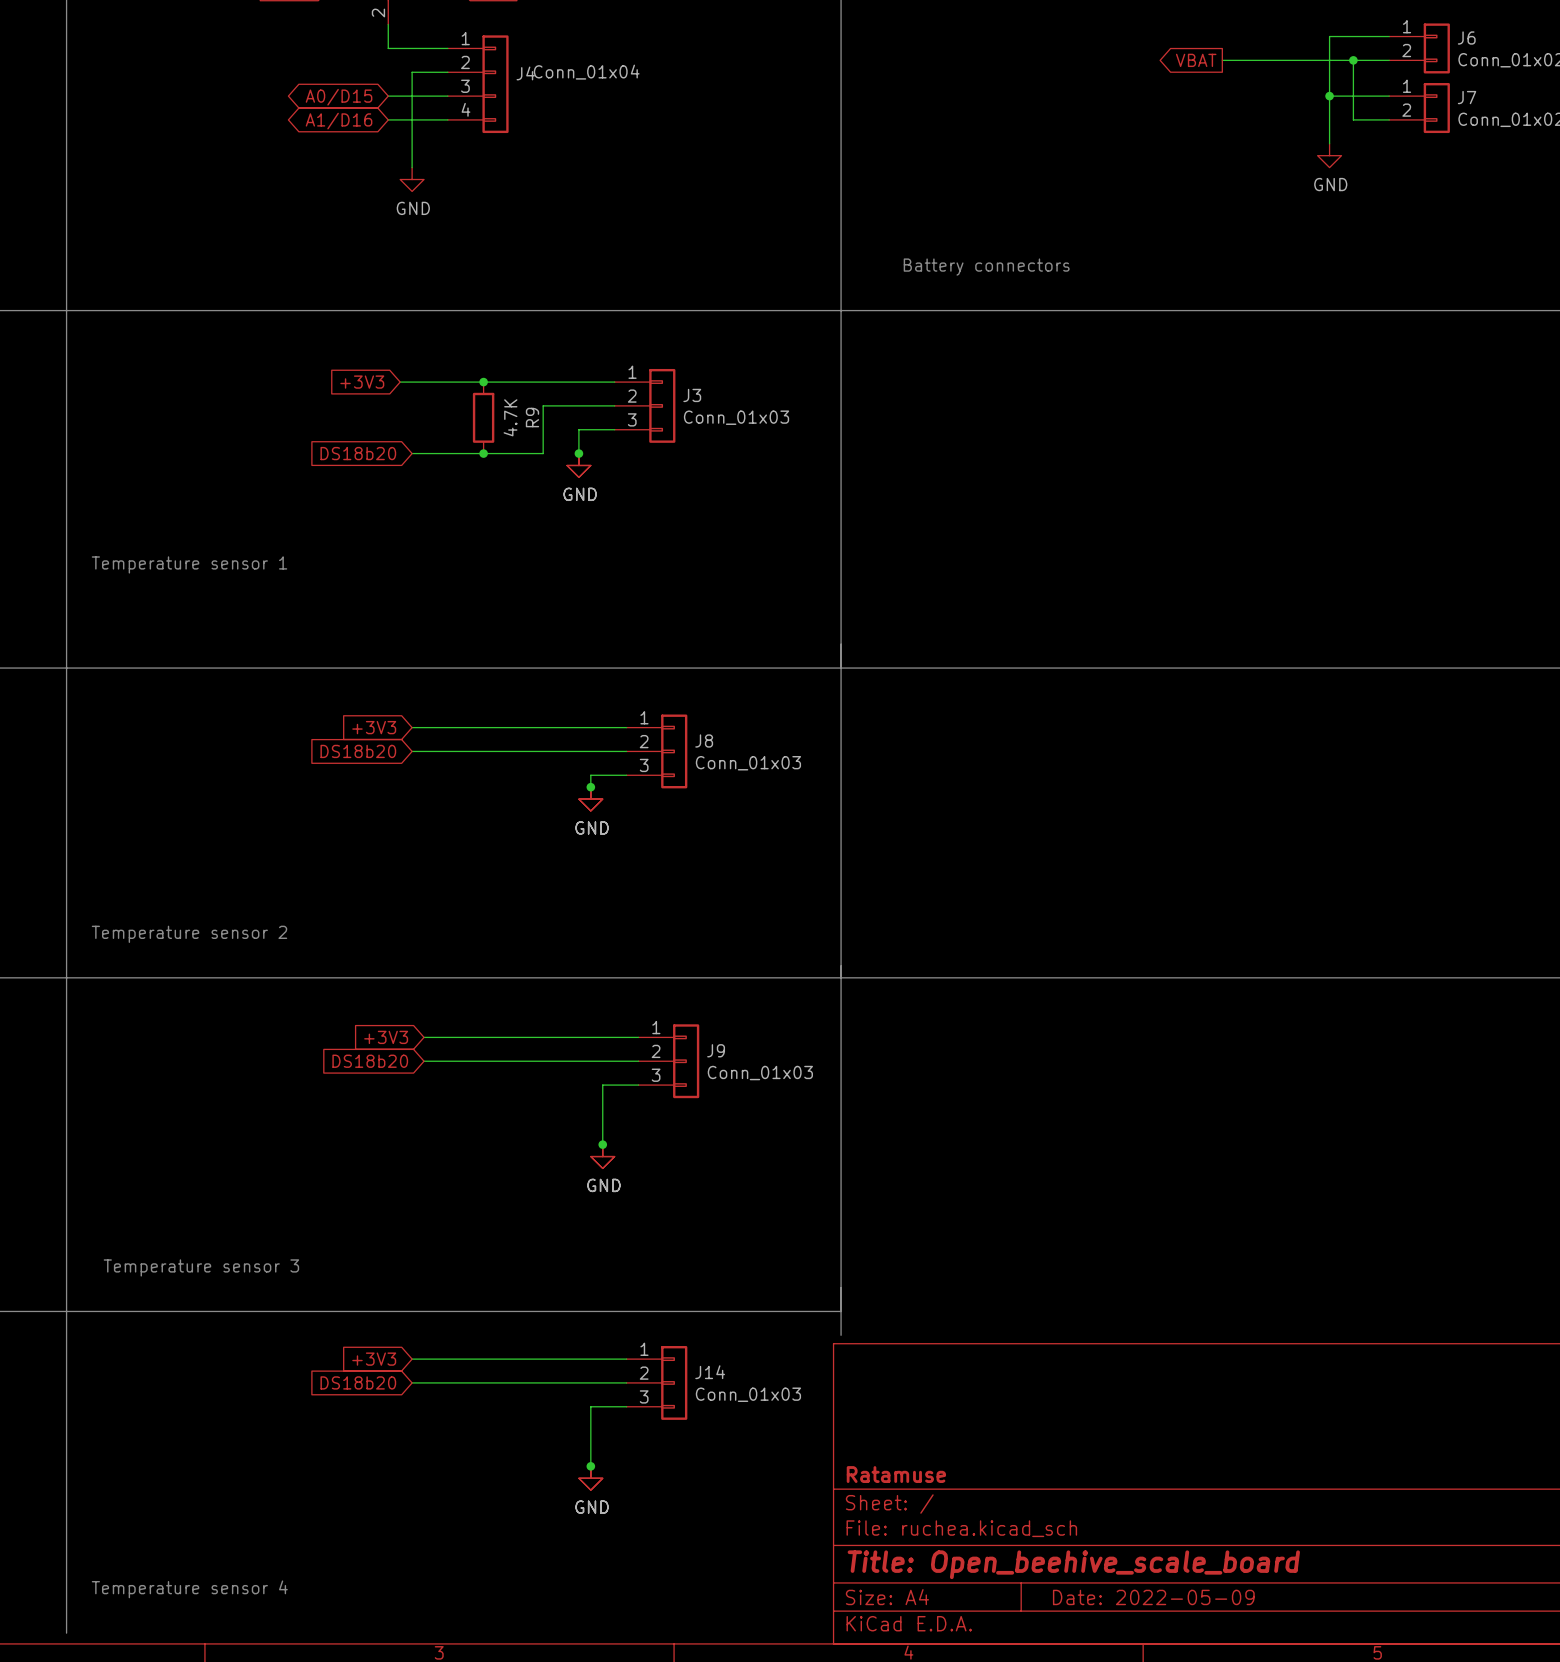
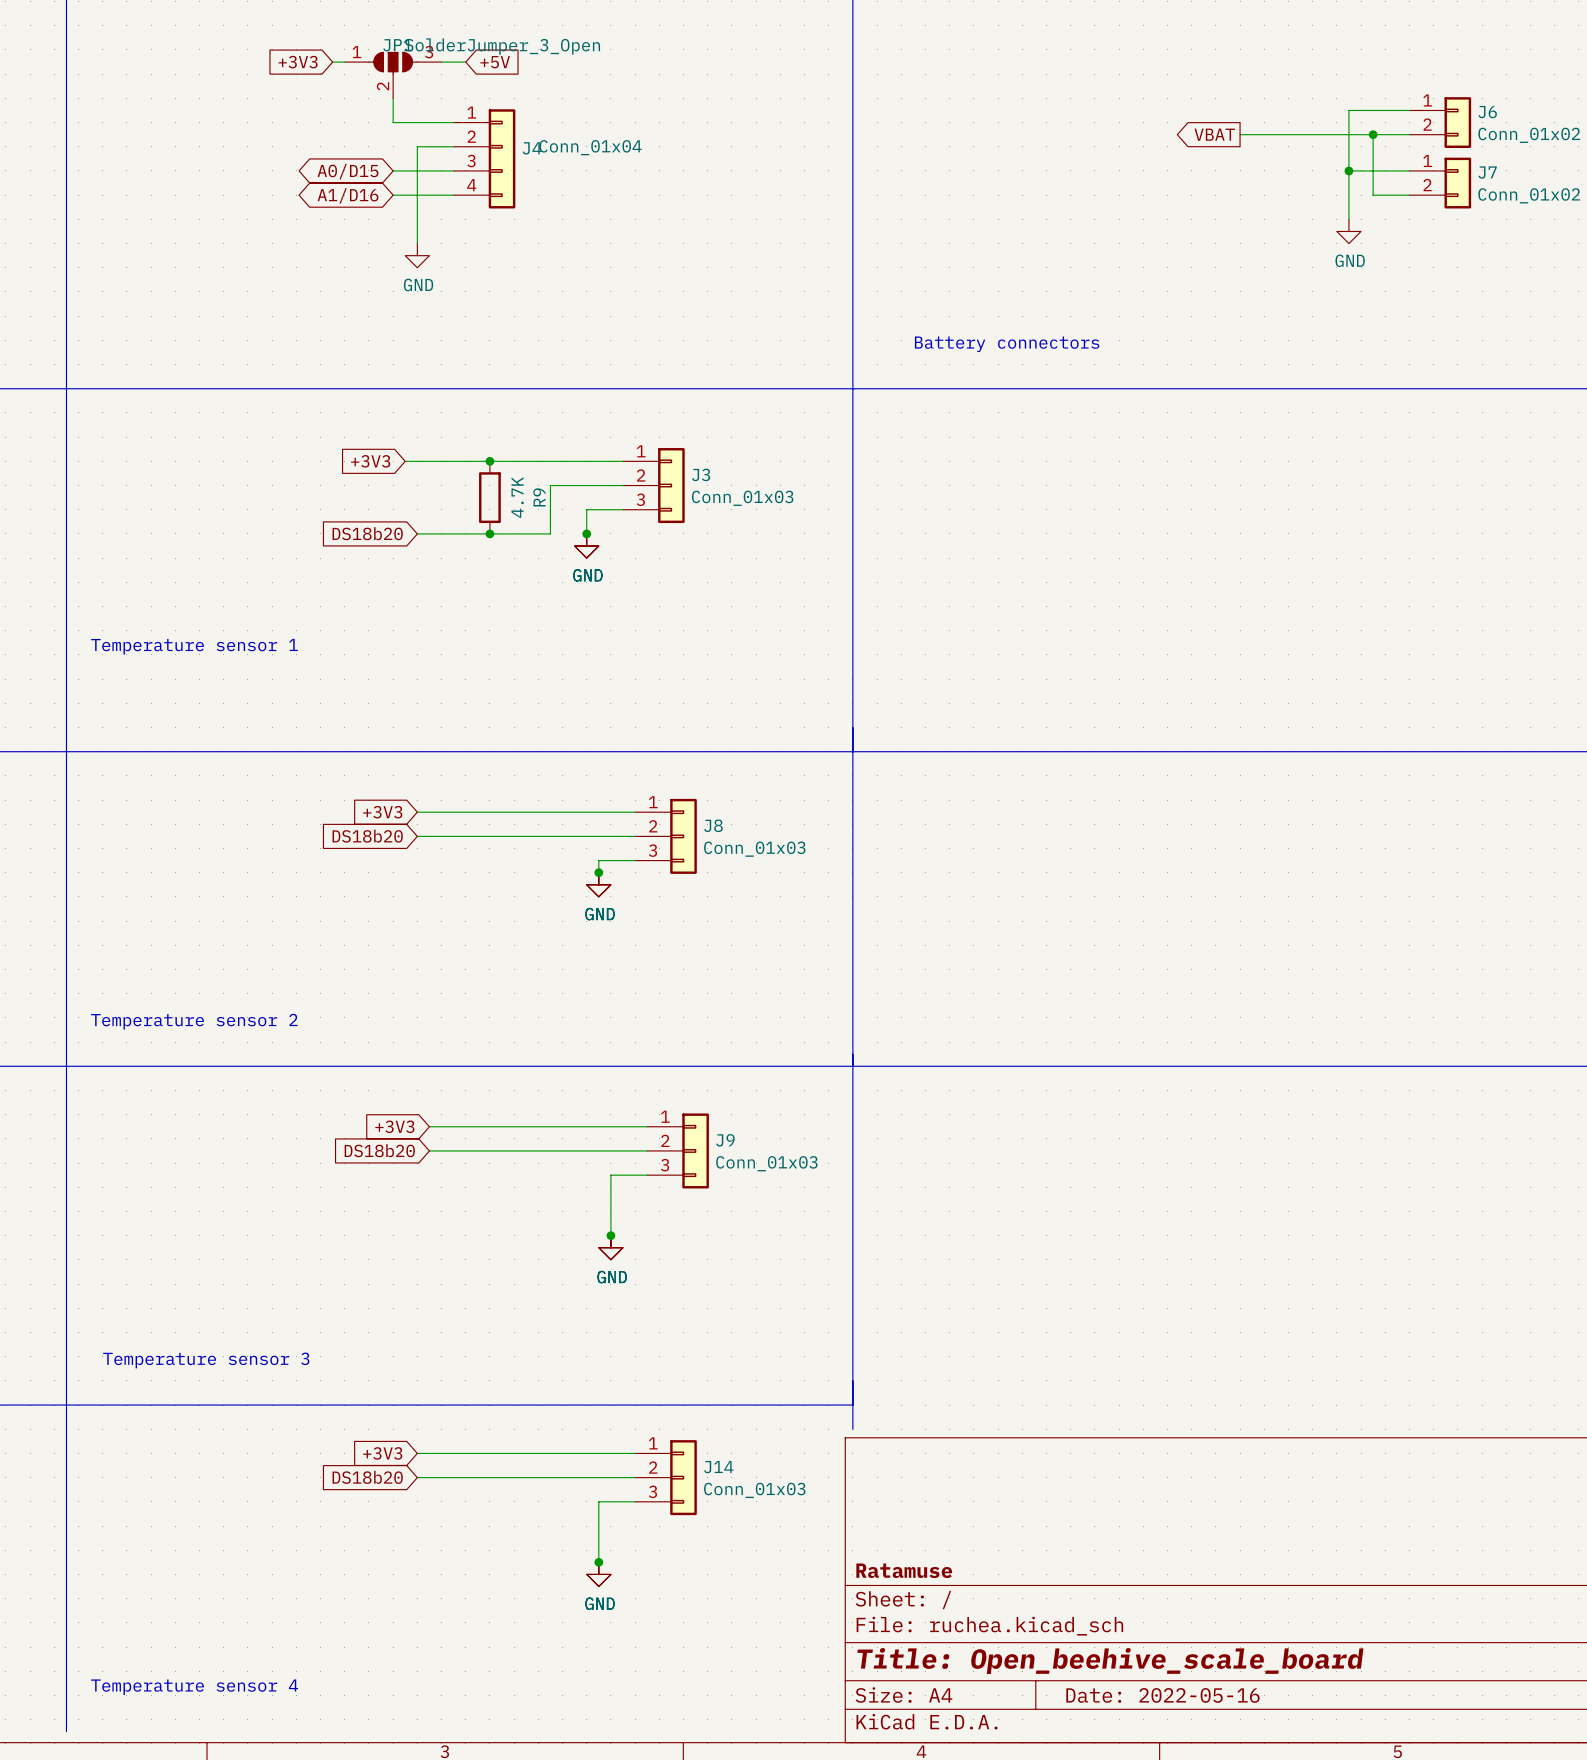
title block: Date: 2022-05-09 (1153, 1597) -> Date: 2022-05-16 (1162, 1695)

